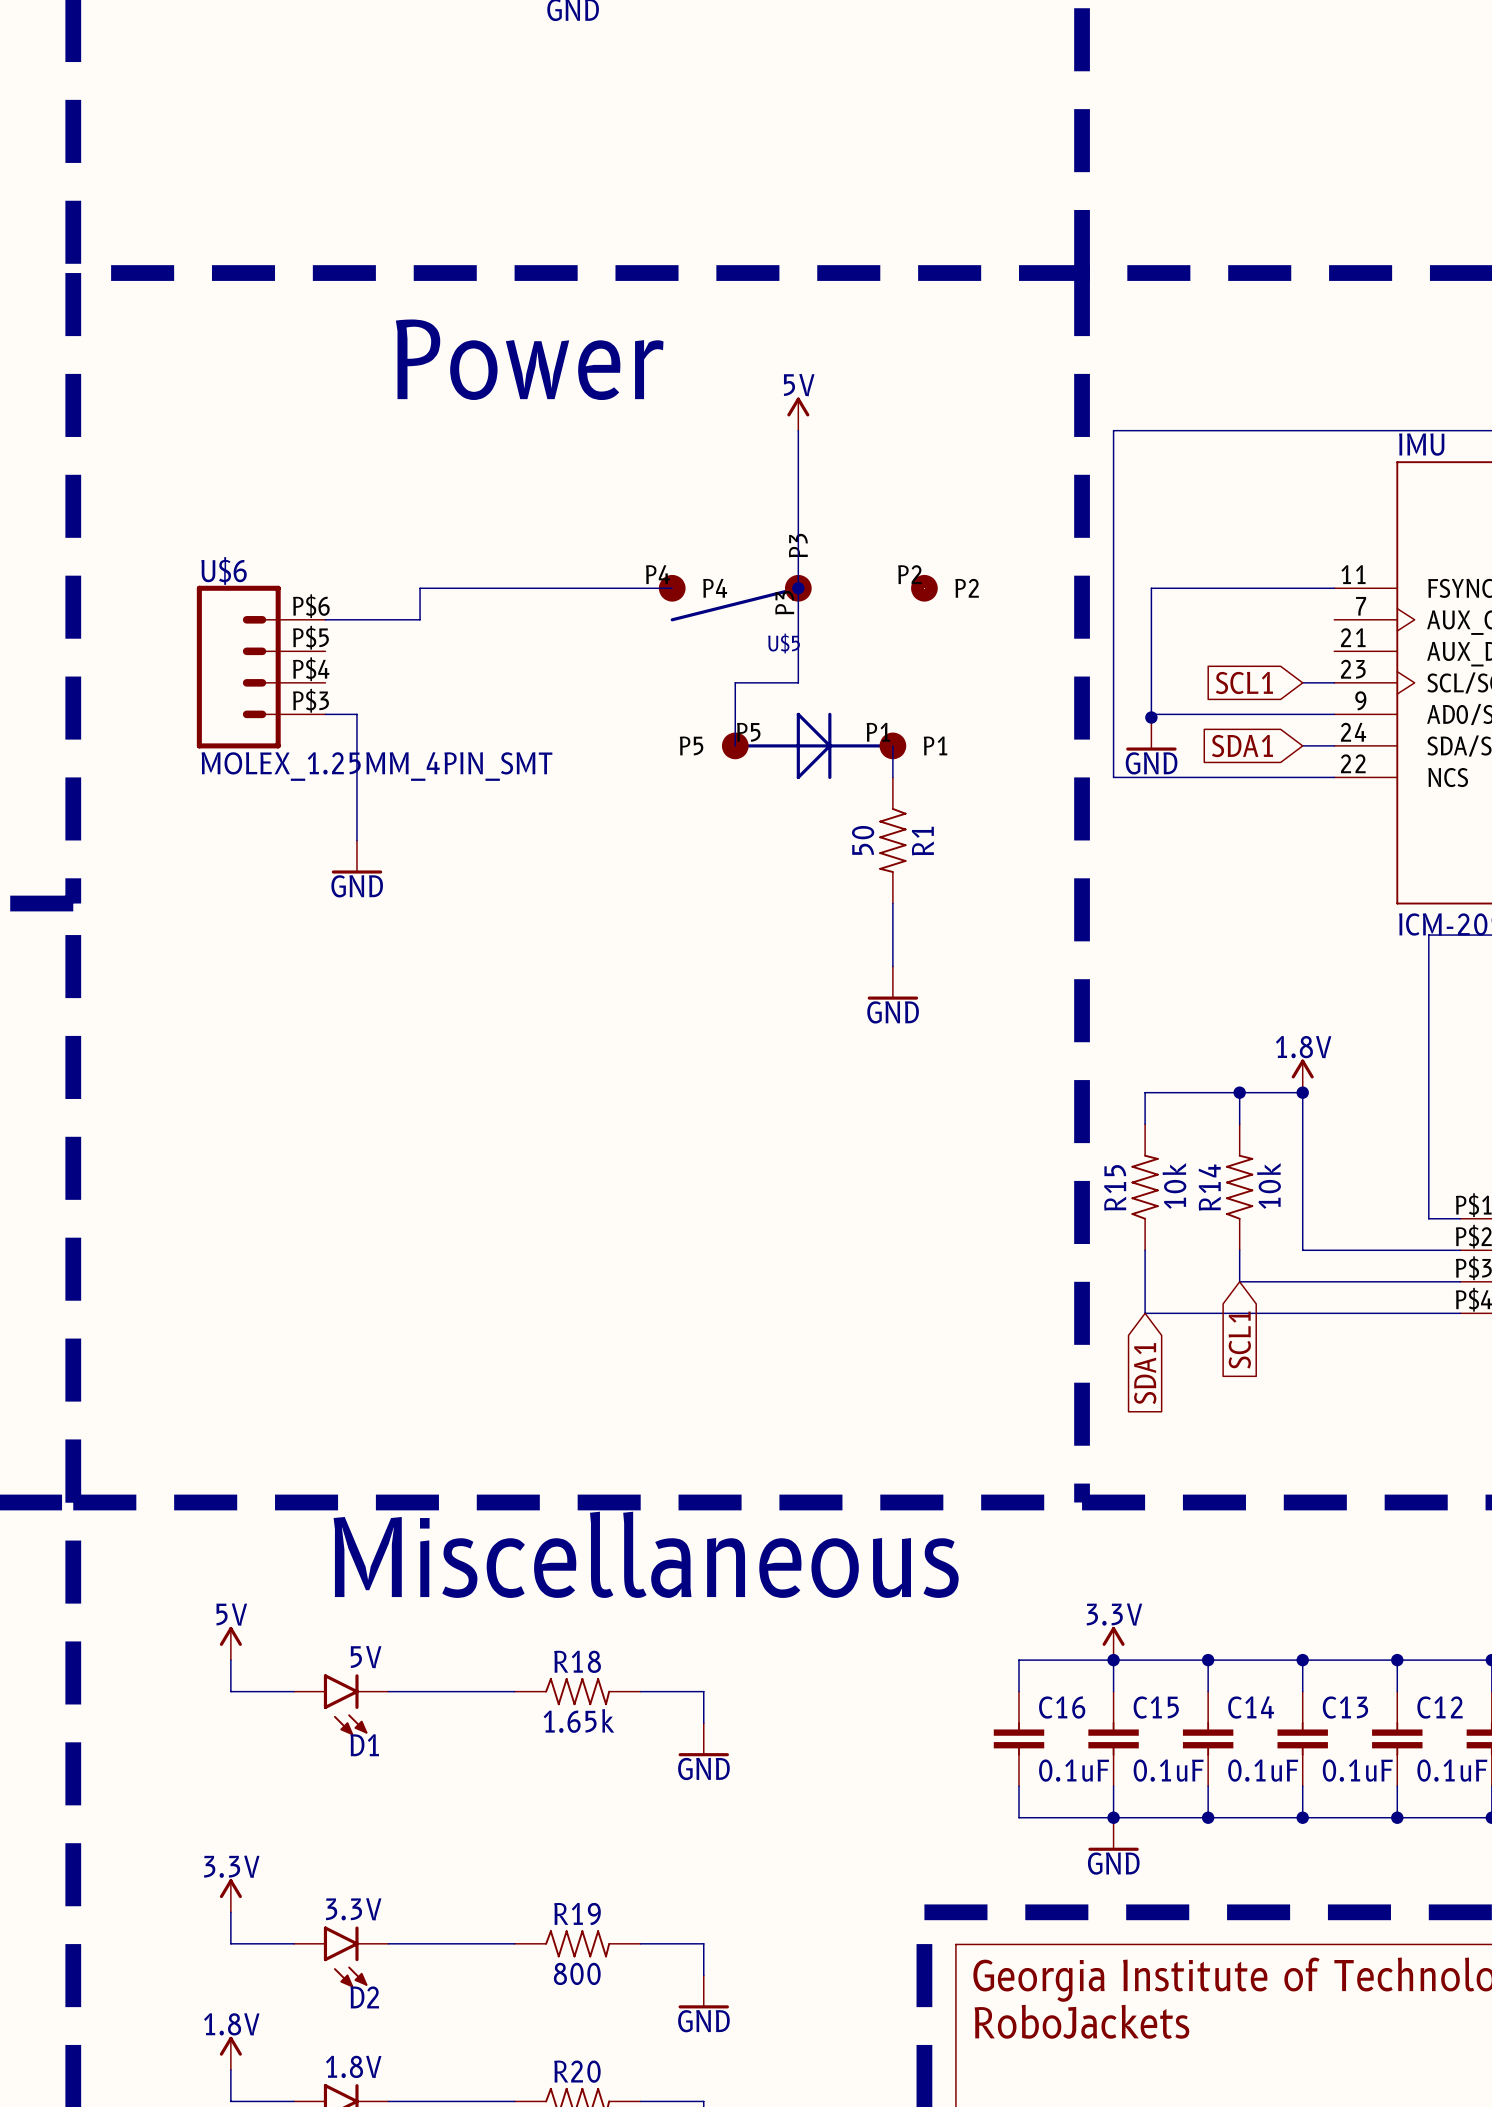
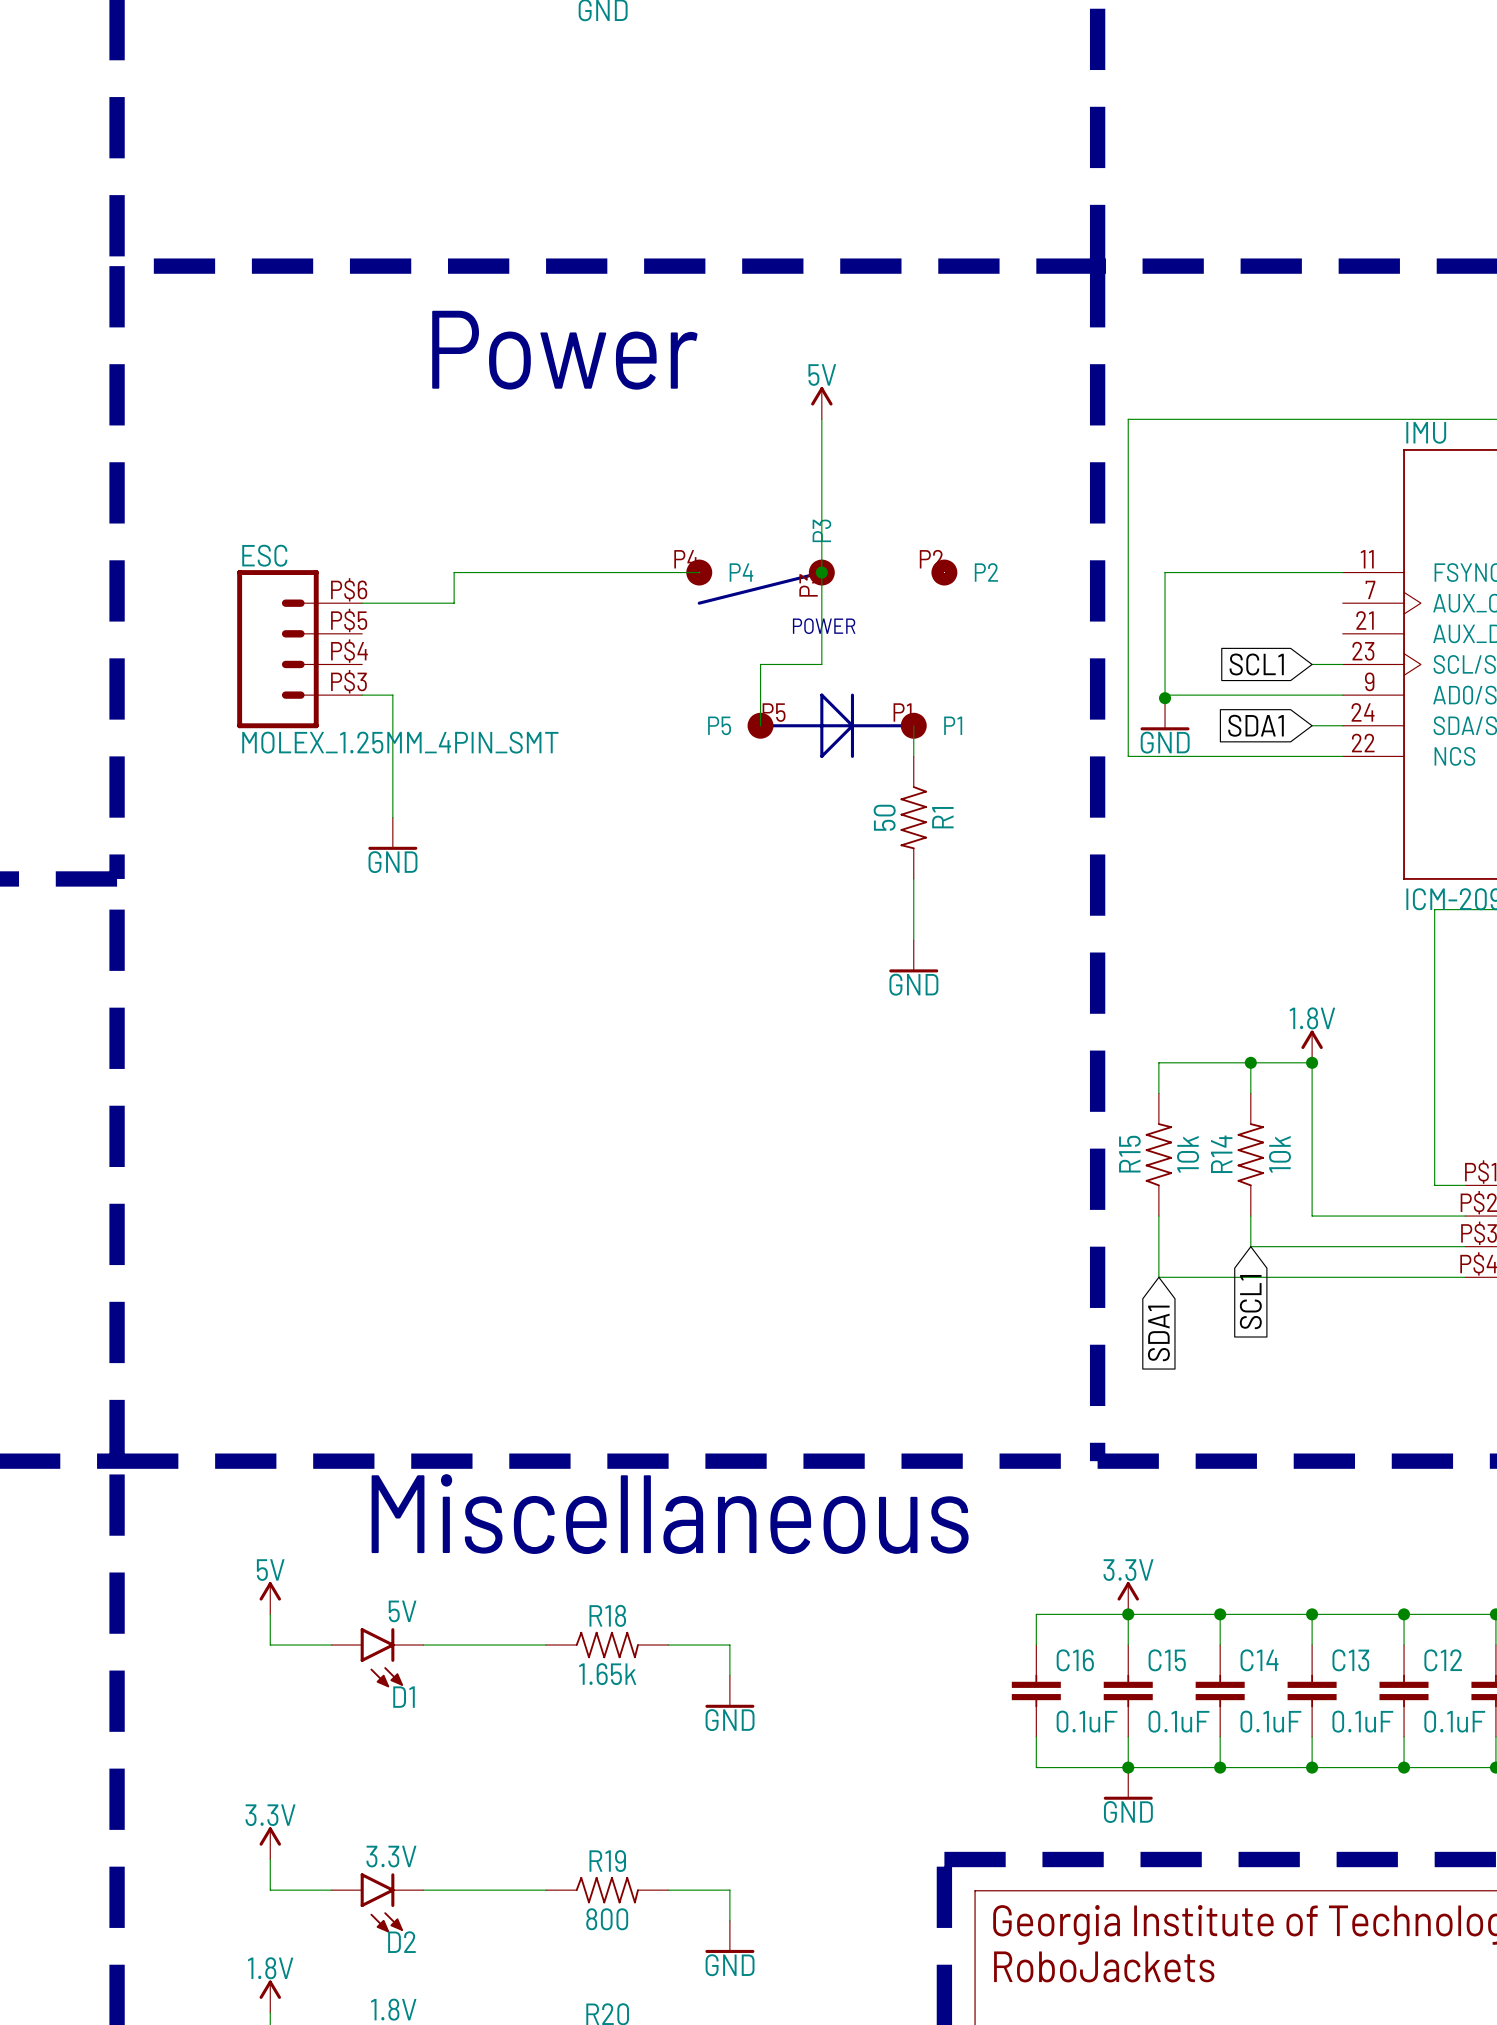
U$6 name: U$6 (224, 570) -> ESC (264, 555)
U$5 name: U$5 (784, 643) -> POWER (824, 626)

